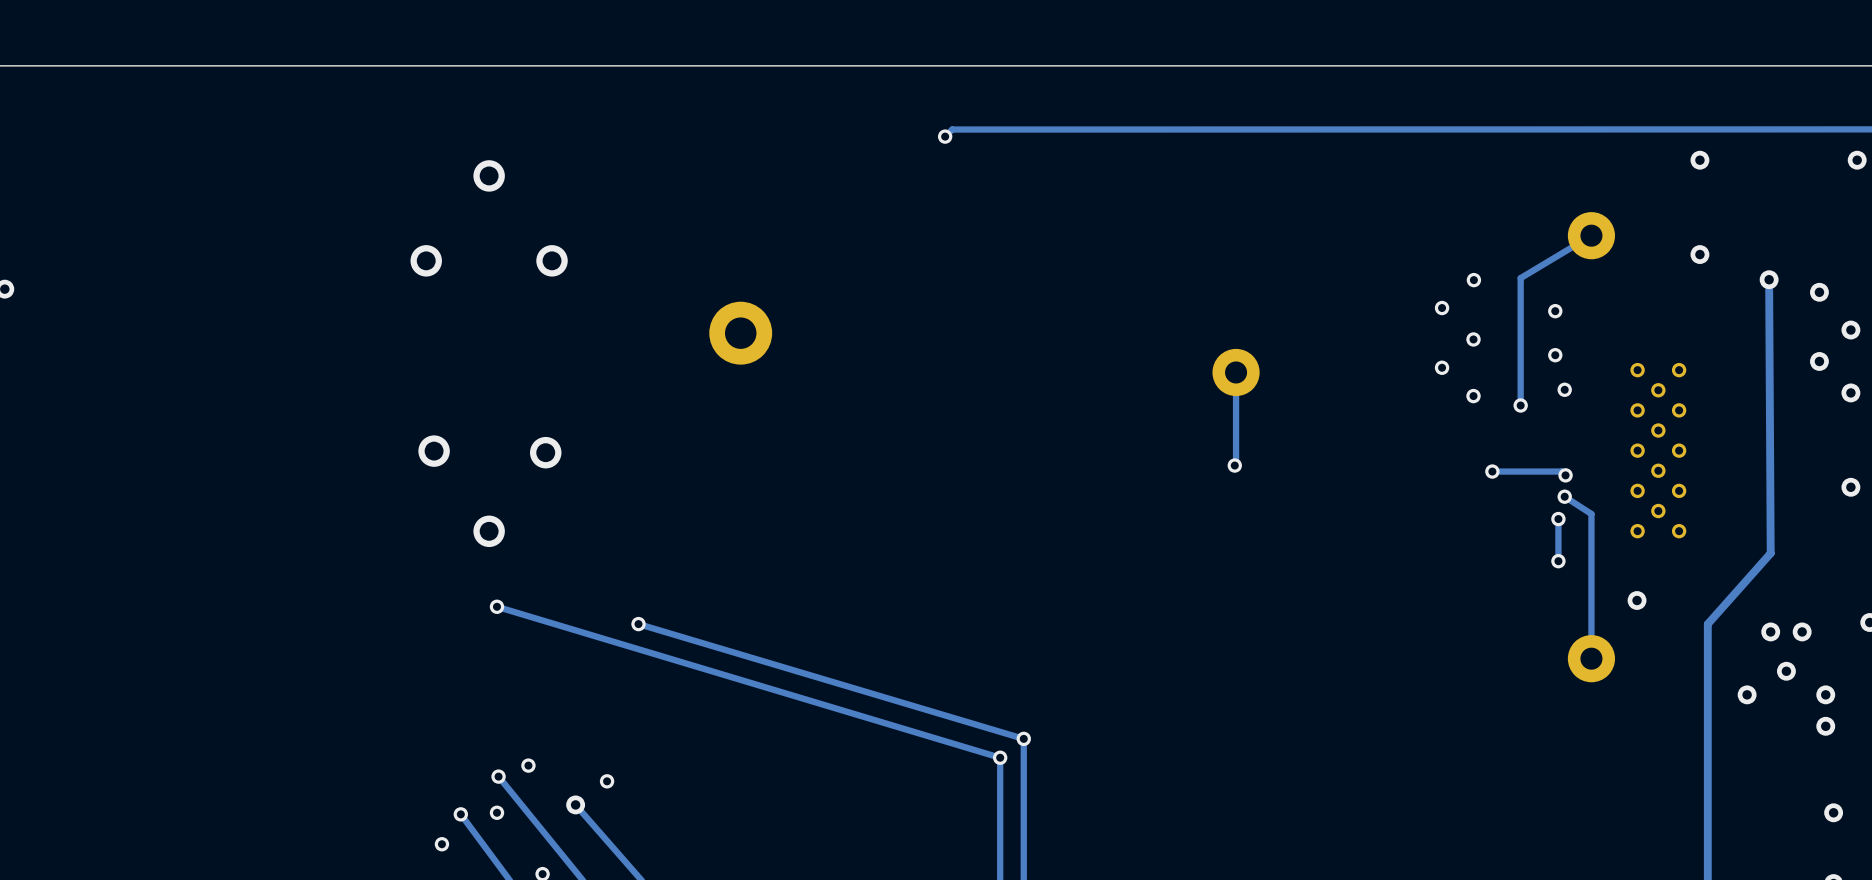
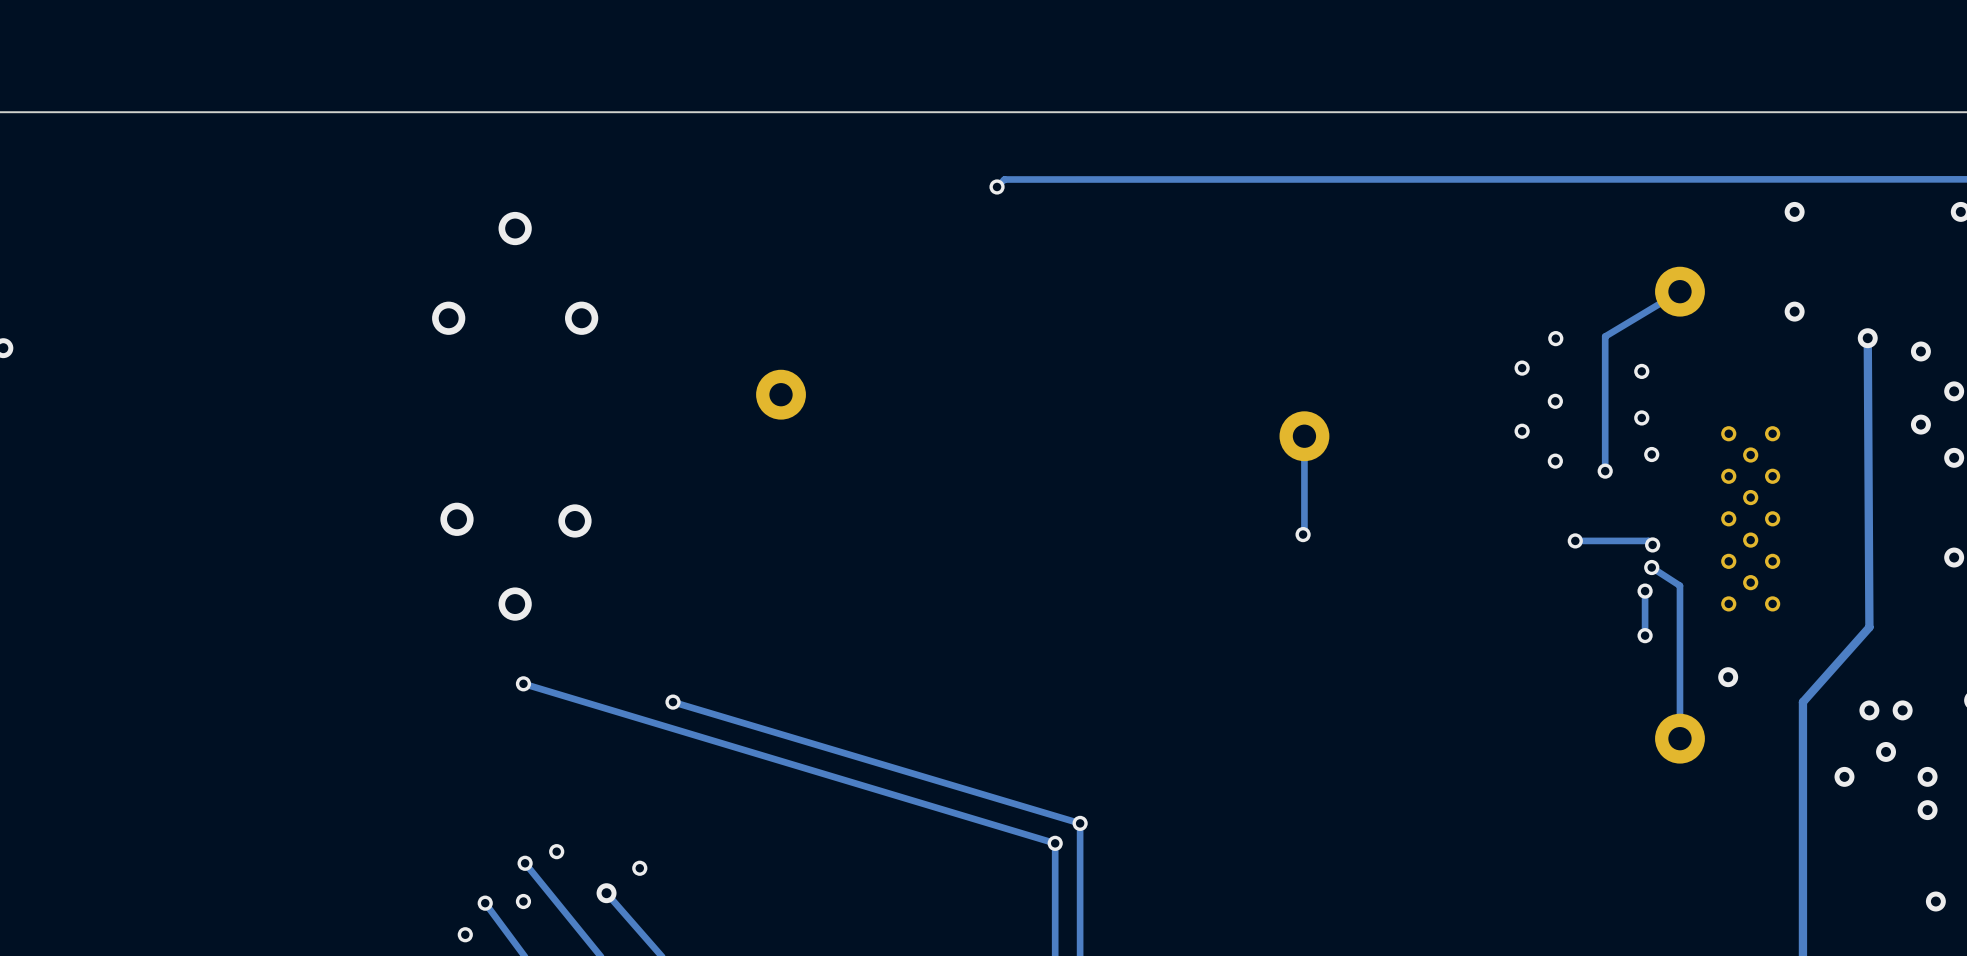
part footprint: [709, 301, 773, 365] -> [756, 369, 806, 420]

